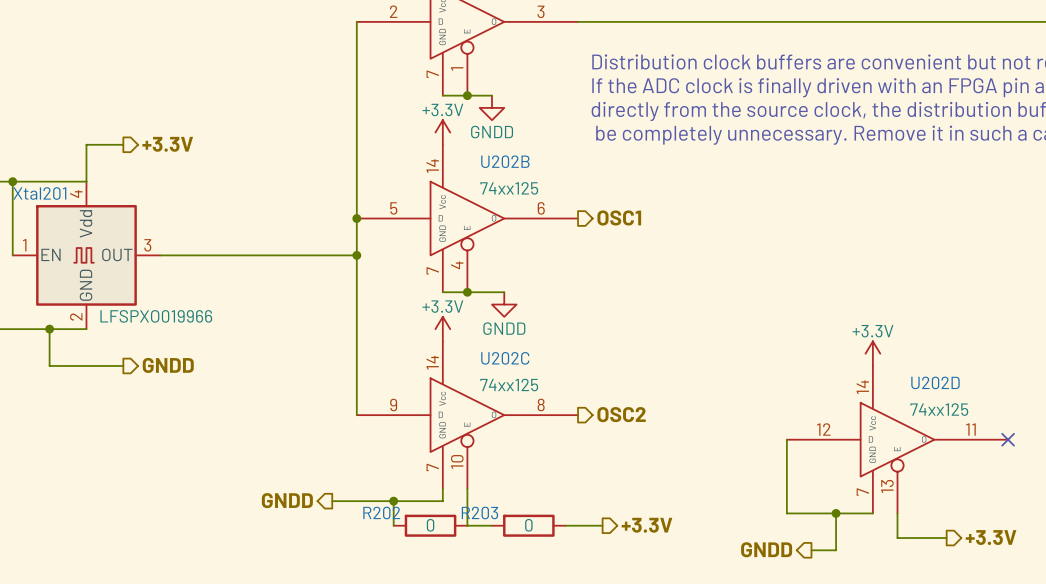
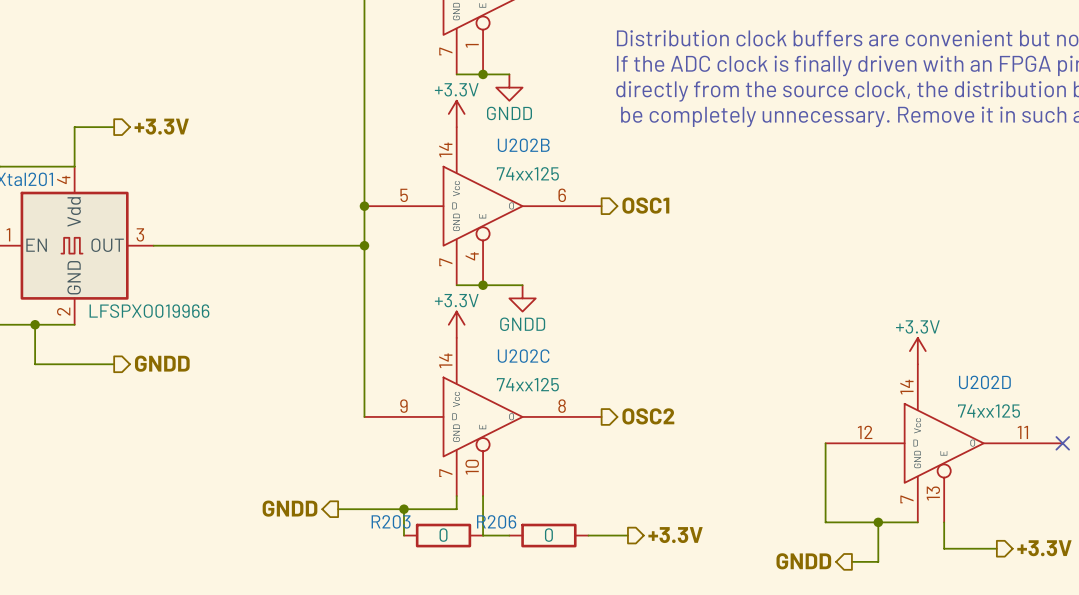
R202 name: R202 (381, 512) -> R203 (391, 521)
R203 name: R203 (479, 512) -> R206 (496, 521)

